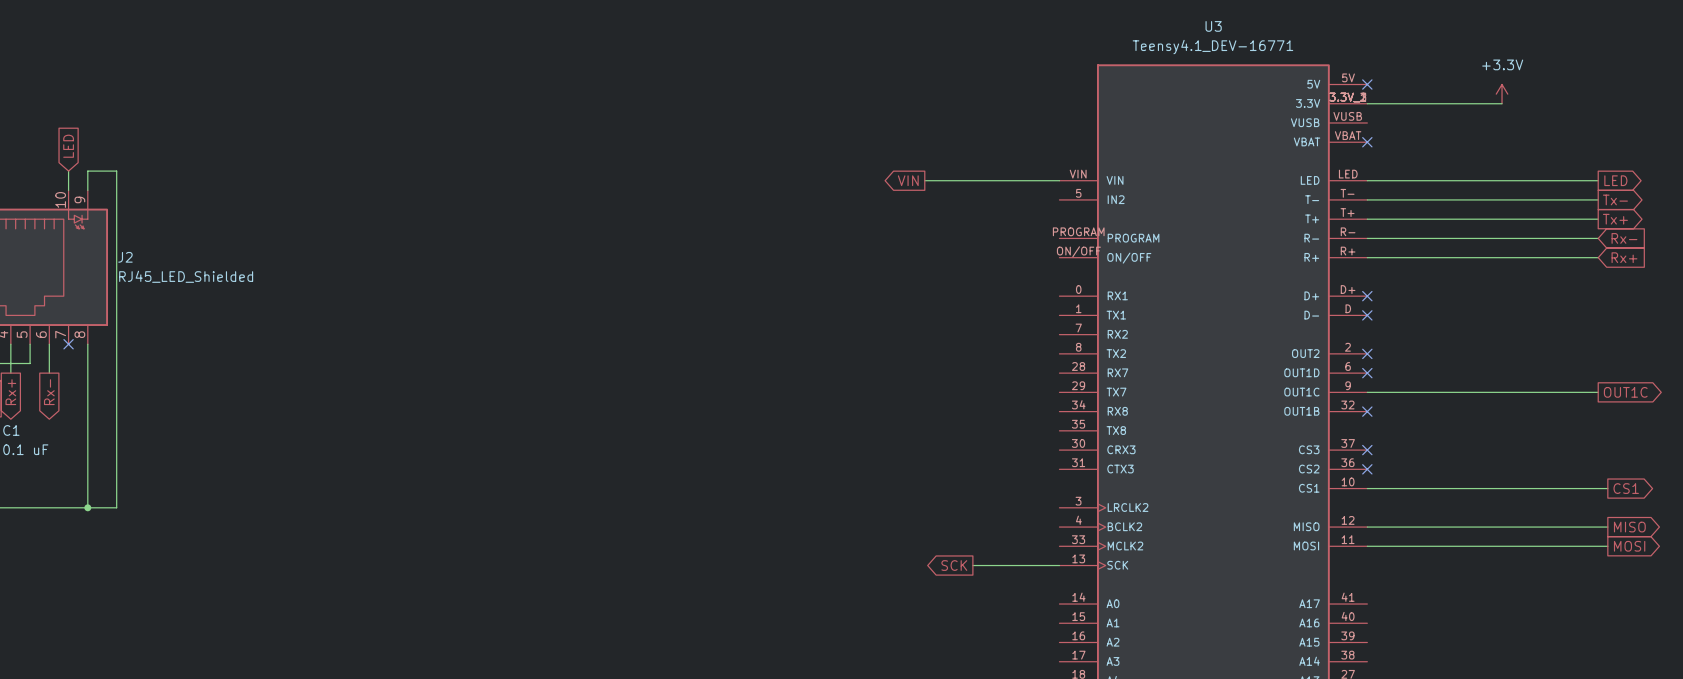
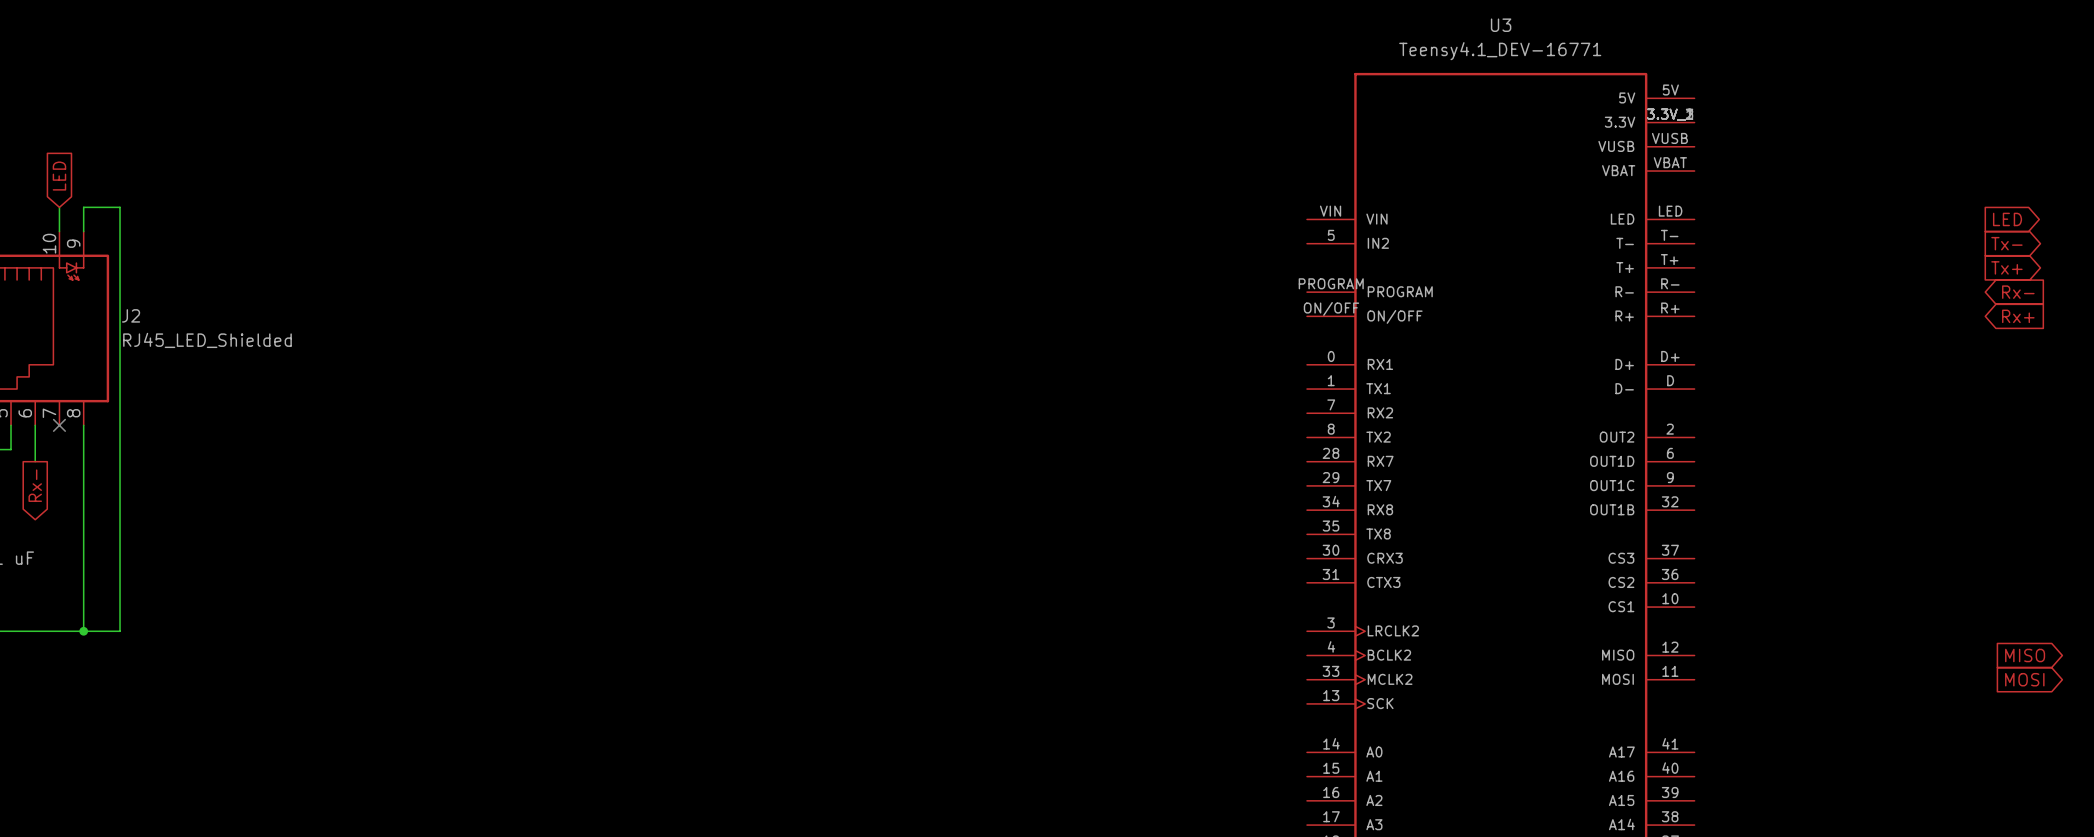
no-connect mark: (1367, 84) -> none
power symbol: +3.3V (1502, 94) -> none
wire: (1367, 103) (1502, 103) -> none
no-connect mark: (1367, 142) -> none
global label: VIN (908, 180) -> none
wire: (924, 180) (1059, 180) -> none
wire: (1367, 180) (1598, 180) -> none
wire: (1367, 199) (1598, 199) -> none
wire: (1367, 219) (1598, 219) -> none
wire: (1367, 238) (1598, 238) -> none
wire: (1367, 257) (1598, 257) -> none
no-connect mark: (1367, 296) -> none
no-connect mark: (1367, 315) -> none
no-connect mark: (1367, 353) -> none
no-connect mark: (1367, 373) -> none
wire: (1367, 392) (1598, 392) -> none
global label: OUT1C (1625, 392) -> none
no-connect mark: (1367, 411) -> none
no-connect mark: (1367, 450) -> none
no-connect mark: (1367, 469) -> none
wire: (1367, 488) (1607, 488) -> none
global label: CS1 (1626, 488) -> none
wire: (1367, 527) (1607, 527) -> none
wire: (1367, 546) (1607, 546) -> none
global label: SCK (954, 565) -> none
wire: (972, 565) (1059, 565) -> none

